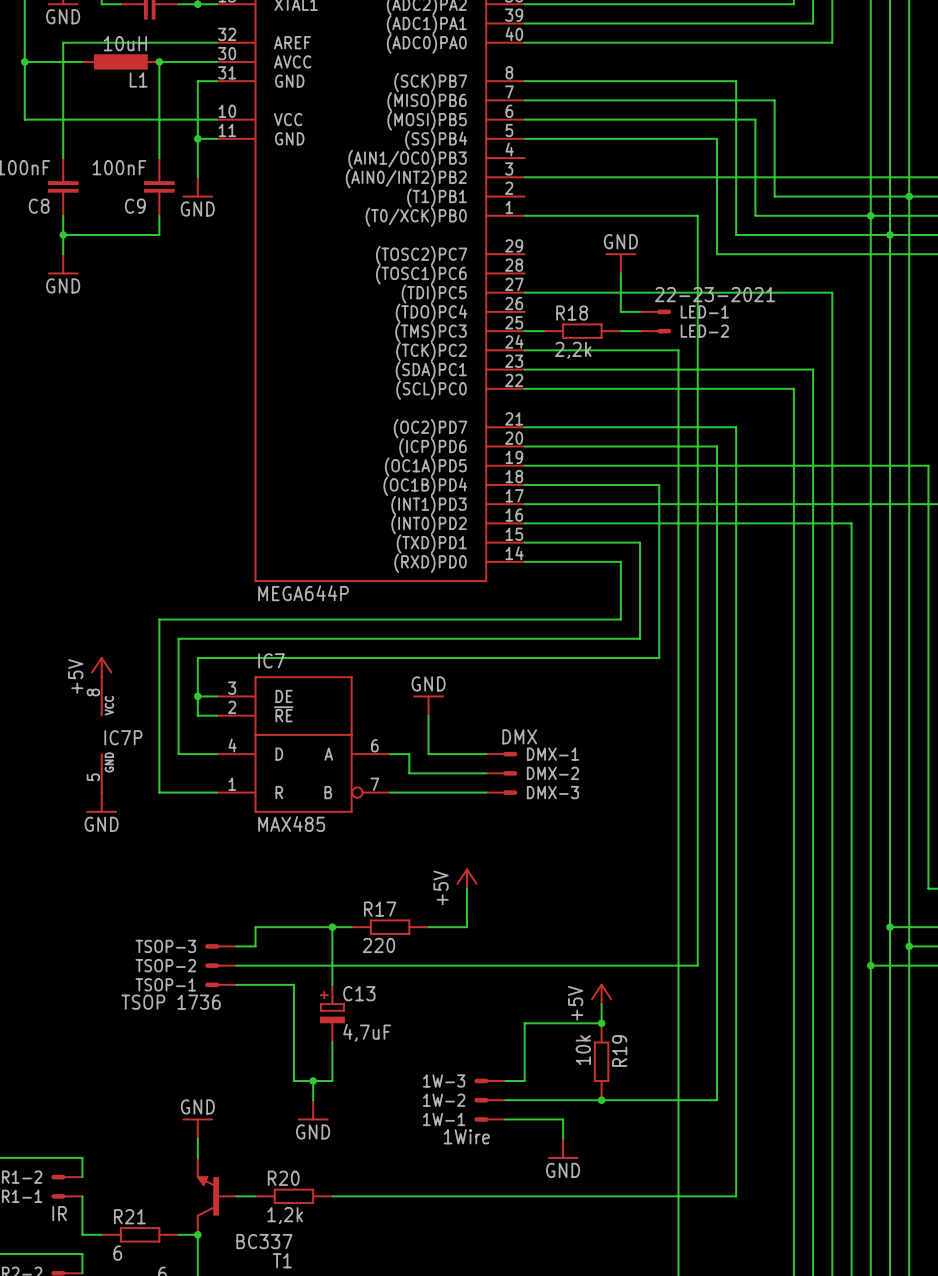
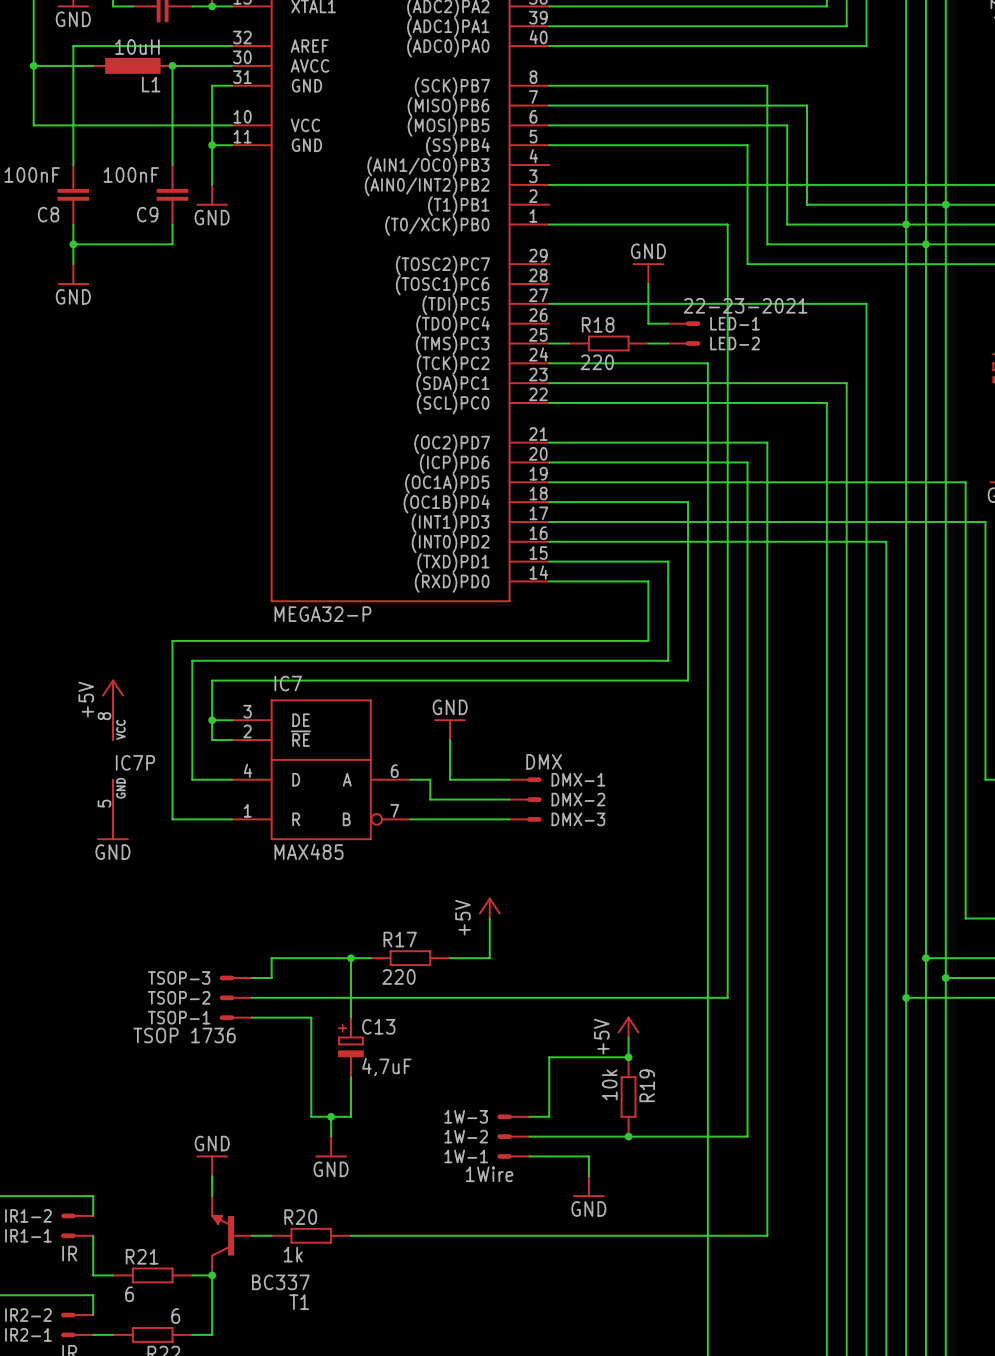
R18 value: 2,2k (573, 350) -> 220 (597, 362)
part value: MEGA644P (303, 593) -> MEGA32-P (322, 614)
R20 value: 1,2k (285, 1215) -> 1k (293, 1254)

